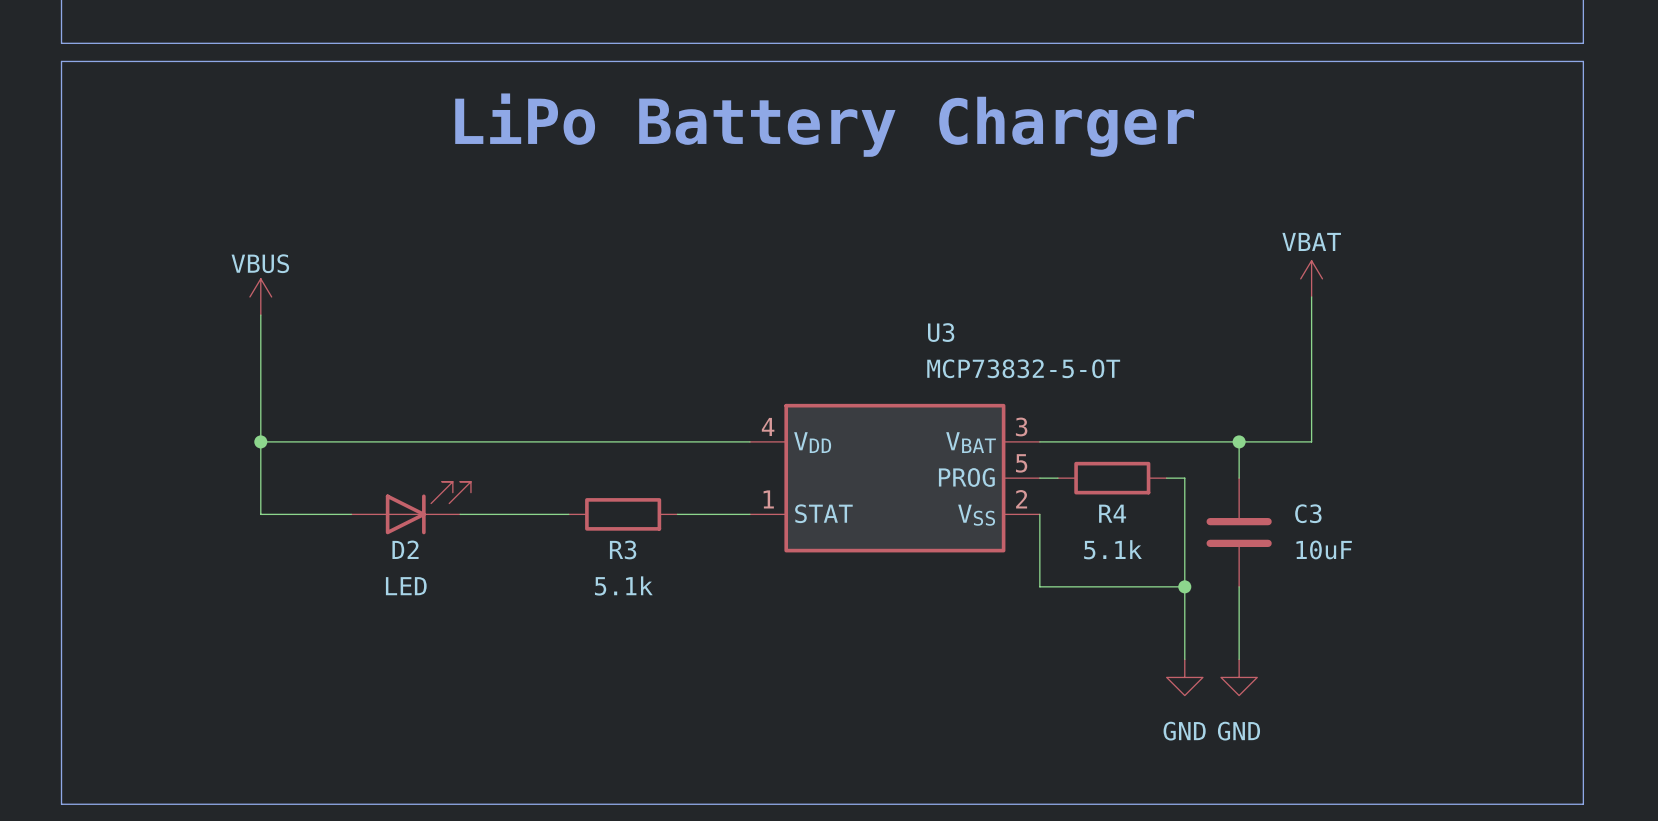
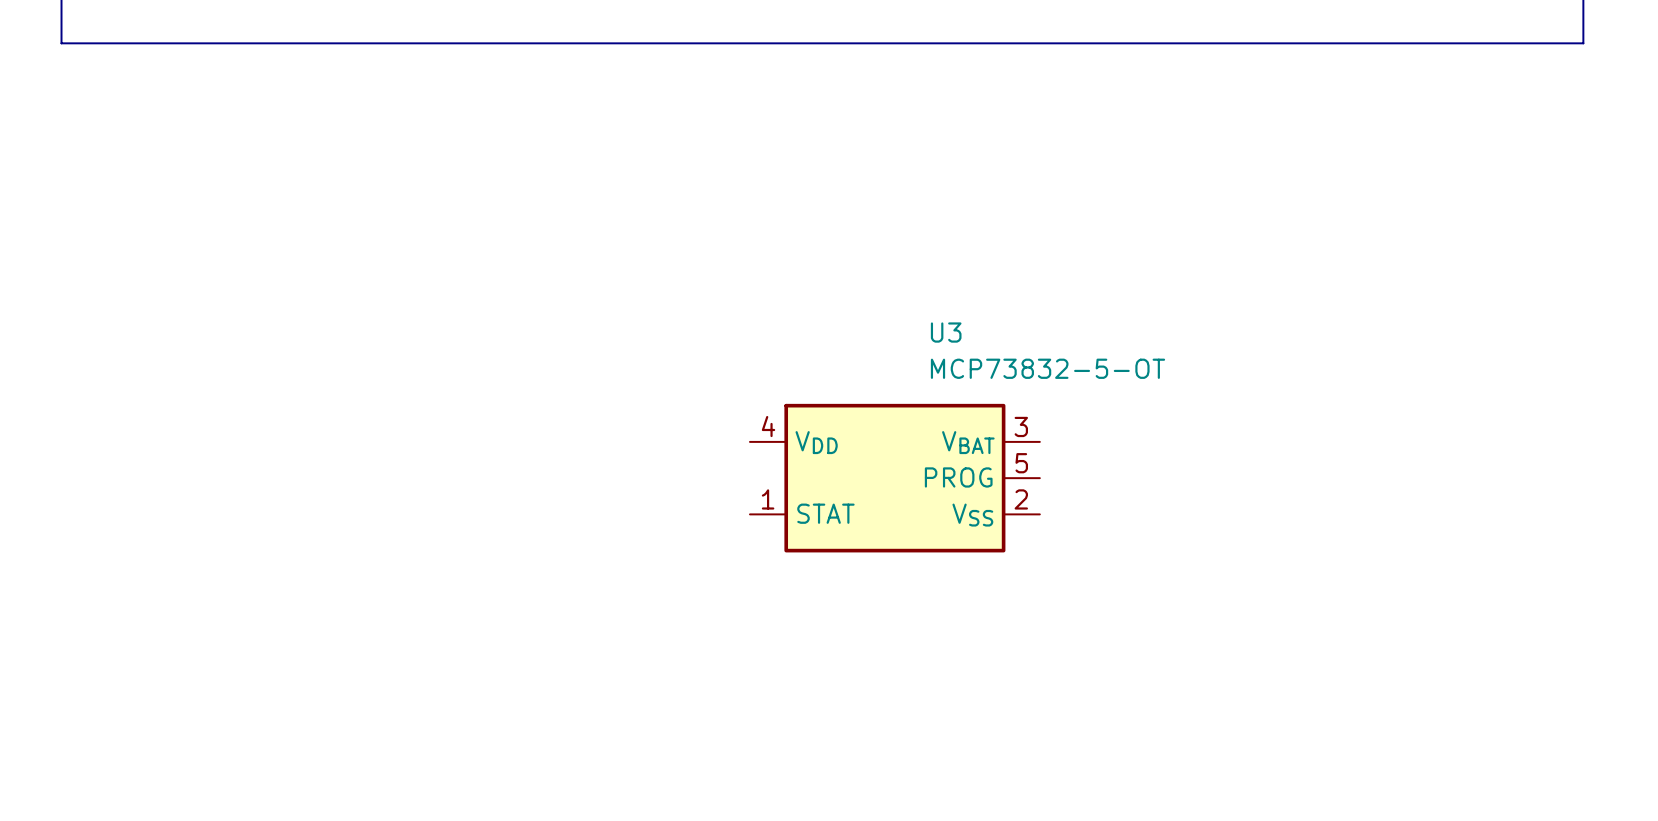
line: (61, 61) (61, 804) (1583, 804) (1583, 61) (61, 61) -> none
text: LiPo Battery Charger (824, 125) -> none
power symbol: VBAT (1311, 278) -> none
power symbol: VBUS (260, 296) -> none
wire: (1311, 296) (1311, 441) (1039, 441) -> none
wire: (260, 315) (260, 514) (351, 514) -> none
wire: (260, 441) (749, 441) -> none
junction: (260, 441) -> none
wire: (1239, 441) (1239, 478) -> none
junction: (1239, 441) -> none
wire: (1039, 478) (1057, 478) -> none
R4: 5.1k (1112, 478) -> none
wire: (1166, 478) (1184, 478) (1184, 659) -> none
D2: LED (411, 508) -> none
wire: (460, 514) (568, 514) -> none
R3: 5.1k (623, 514) -> none
wire: (677, 514) (749, 514) -> none
wire: (1039, 514) (1039, 586) (1184, 586) -> none
C3: 10uF (1239, 532) -> none
junction: (1184, 586) -> none
wire: (1239, 586) (1239, 659) -> none
power symbol: GND (1184, 677) -> none
power symbol: GND (1239, 677) -> none

